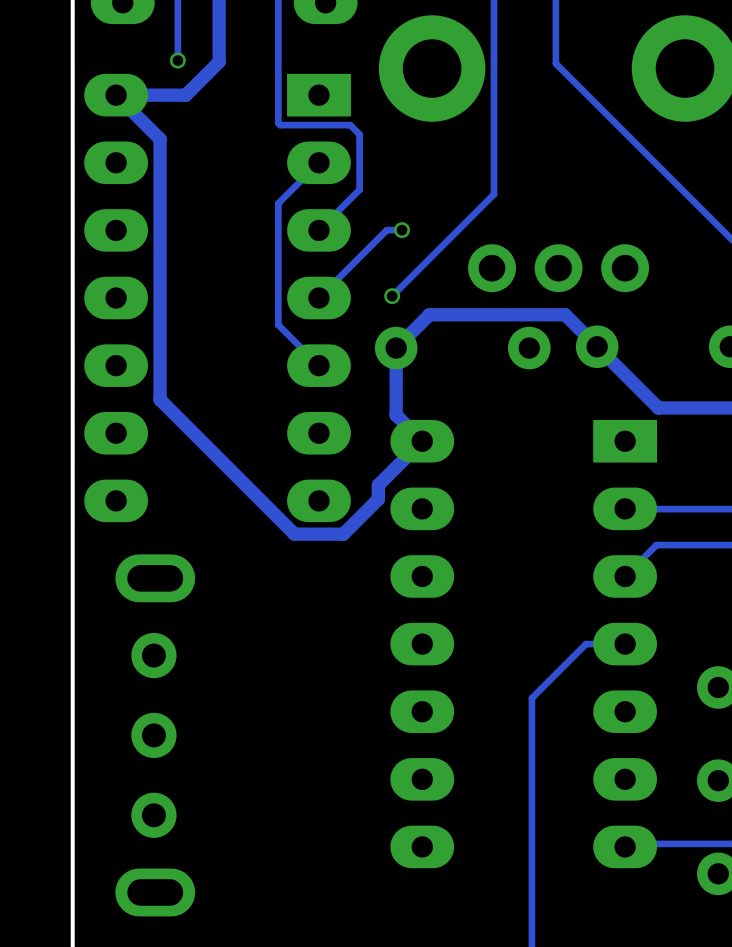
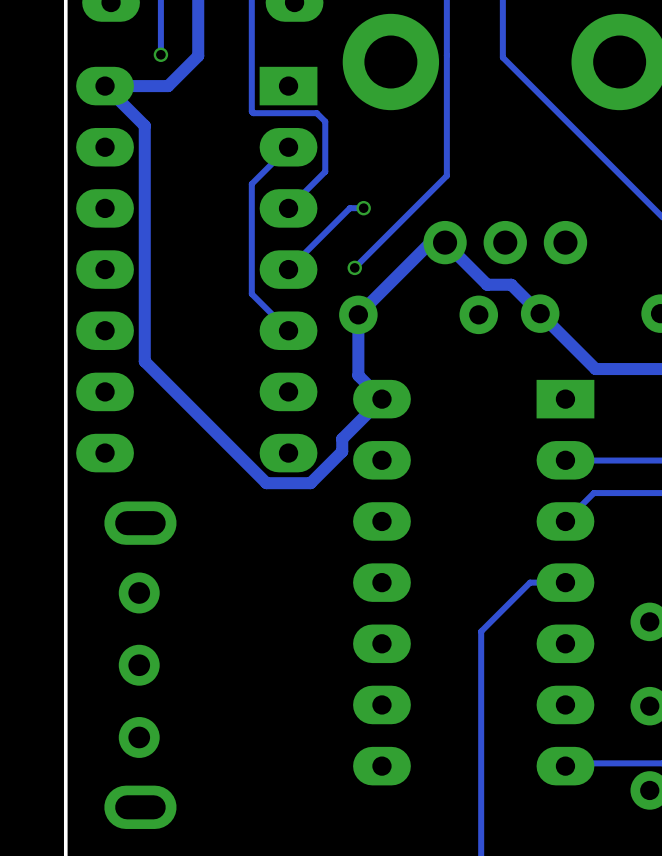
track: none -> (430, 242) (388, 284)
track: (538, 314) (429, 314) -> (487, 284) (445, 242)

